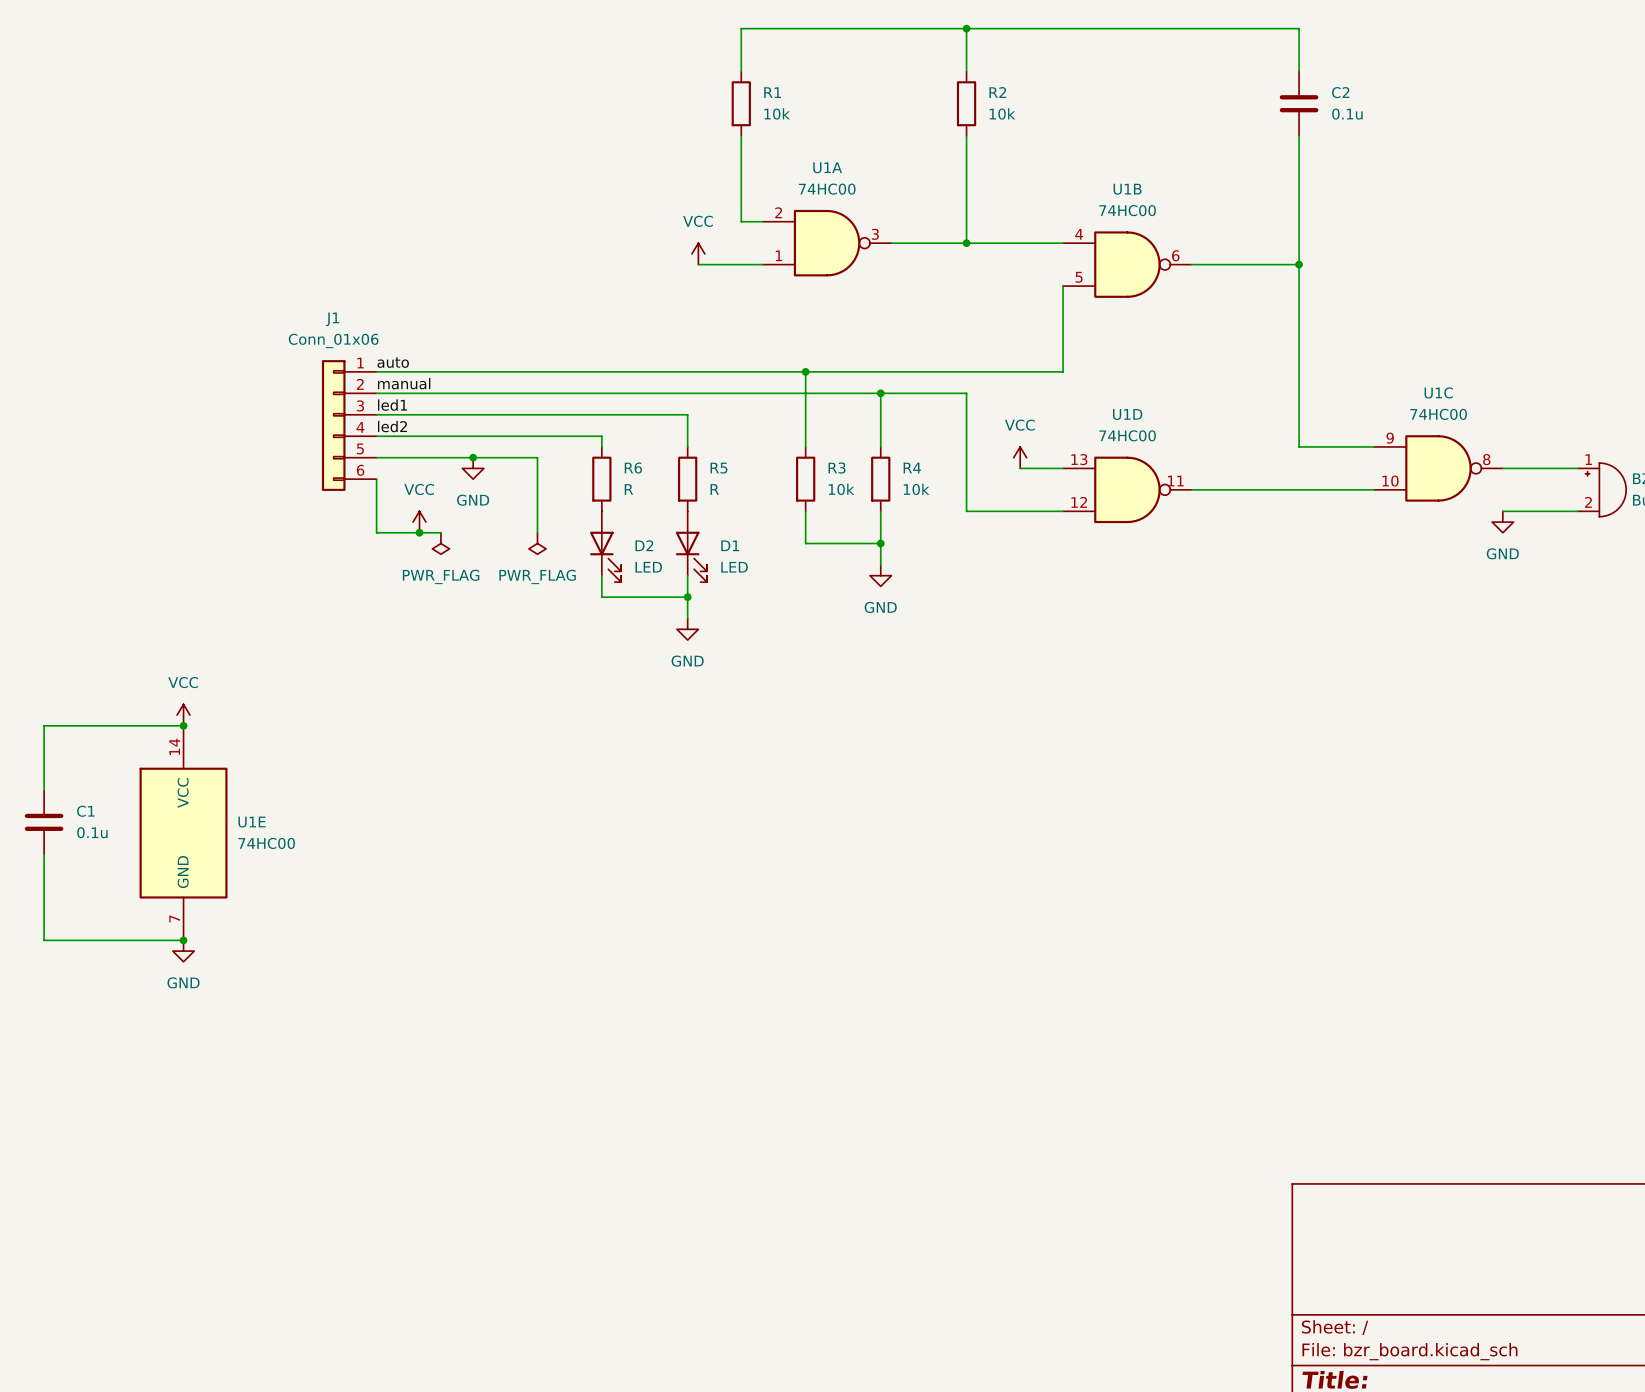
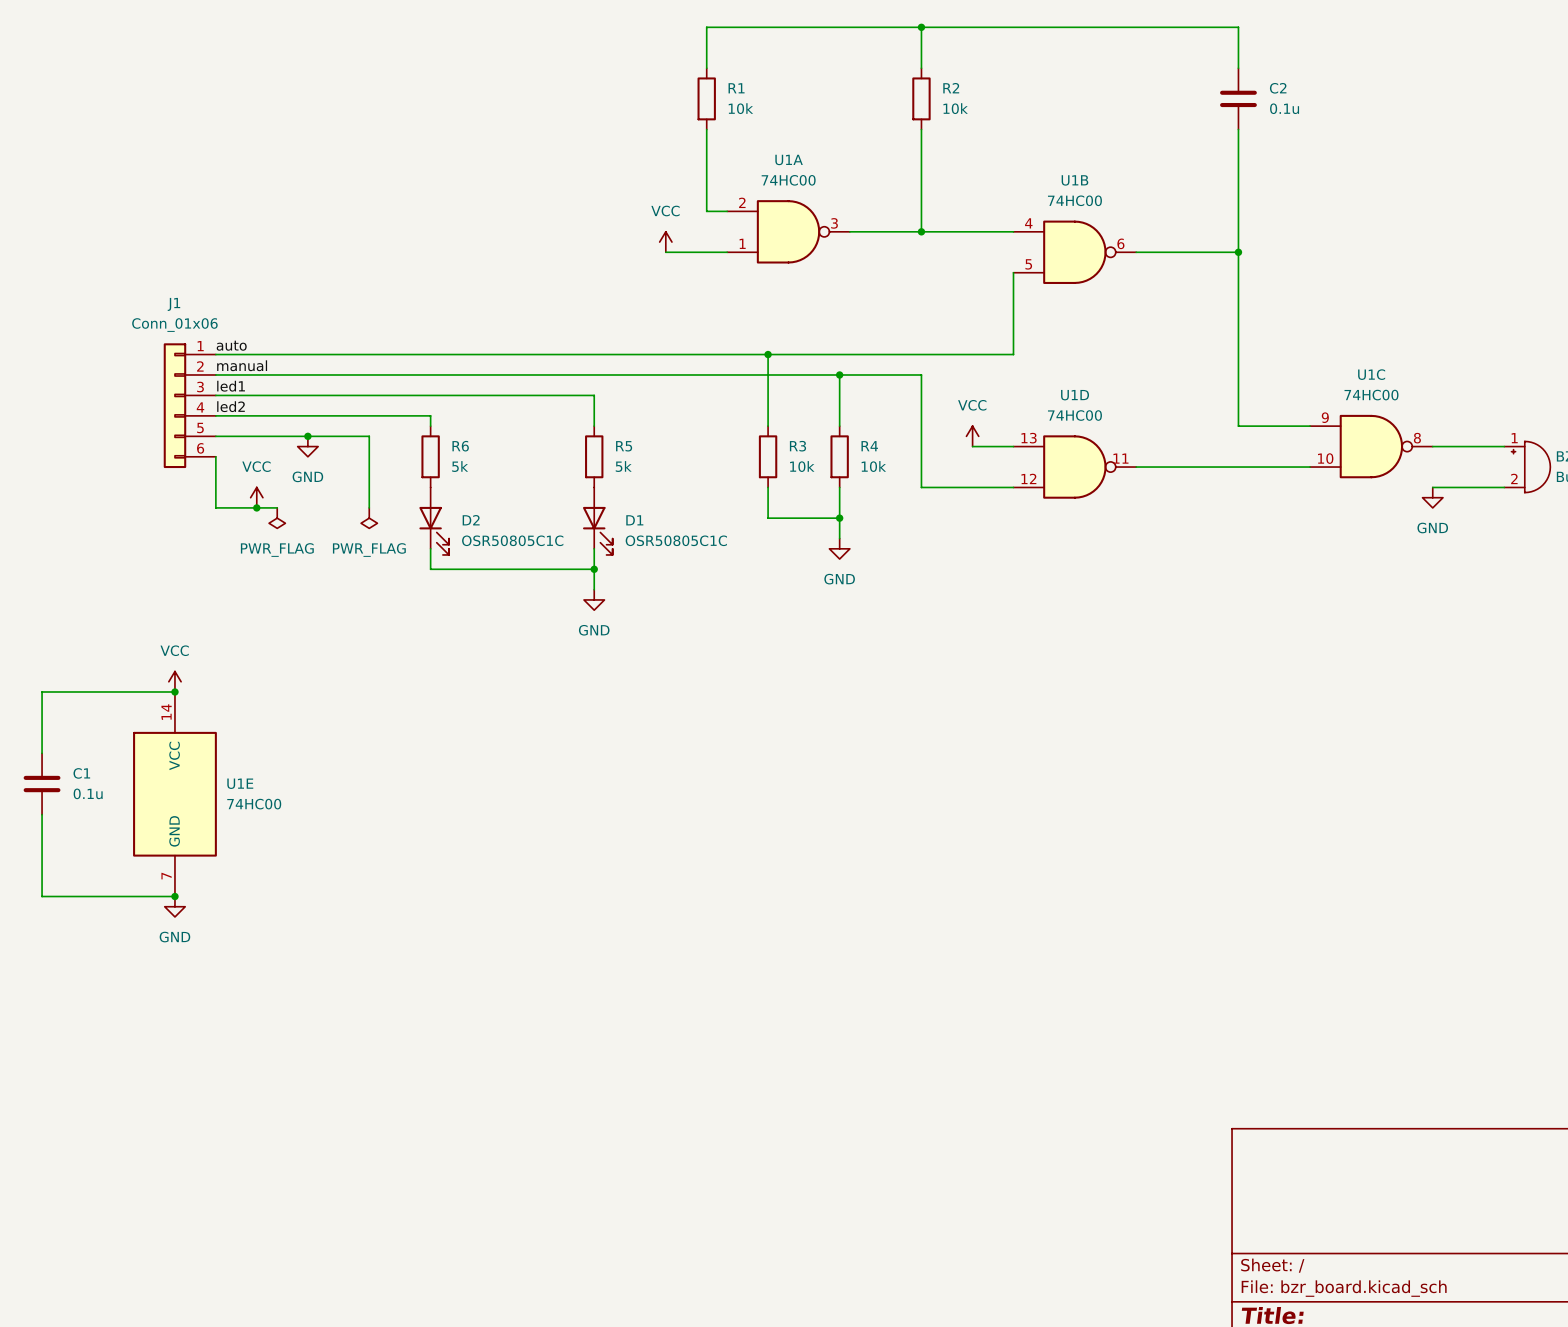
label position: auto (393, 362) -> auto (231, 345)
wire: none -> (215, 354) (359, 354)
label position: manual (404, 383) -> manual (242, 365)
wire: none -> (215, 374) (359, 374)
label position: led1 (392, 405) -> led1 (231, 386)
wire: none -> (215, 395) (359, 395)
wire: (623, 414) (687, 414) (687, 446) -> (594, 395) (594, 426)
J1 position: (349, 425) -> (189, 405)
label position: led2 (392, 426) -> led2 (231, 406)
wire: none -> (215, 415) (359, 415)
wire: (451, 436) (601, 436) (601, 446) -> (430, 415) (430, 426)
wire: none -> (215, 436) (359, 436)
junction: none -> (307, 436)
wire: (387, 457) (537, 457) (537, 532) -> (369, 436) (369, 507)
junction: (473, 457) -> none
power symbol: none -> GND (307, 446)
power symbol: GND (473, 468) -> none
wire: (376, 479) (376, 532) (440, 532) -> (215, 456) (215, 507) (277, 507)
R6 position: (601, 479) -> (430, 456)
R5 position: (687, 479) -> (594, 456)
R6 value: R (628, 489) -> 5k (460, 466)
R5 value: R (714, 489) -> 5k (623, 466)
power symbol position: VCC (419, 522) -> VCC (256, 497)
junction: none -> (256, 507)
junction: (419, 532) -> none
power symbol: none -> PWR_FLAG (277, 518)
power symbol position: PWR_FLAG (440, 543) -> PWR_FLAG (369, 518)
power symbol: PWR_FLAG (537, 543) -> none
D2 position: (605, 546) -> (434, 521)
D1 position: (691, 546) -> (597, 521)
D2 value: LED (648, 567) -> OSR50805C1C (512, 540)
D1 value: LED (734, 567) -> OSR50805C1C (676, 540)
wire: (601, 575) (601, 597) -> (430, 548) (430, 569) (573, 569)
wire: (687, 575) (687, 618) -> (594, 548) (594, 589)
wire: (623, 597) (687, 597) -> none
junction: none -> (594, 569)
junction: (687, 597) -> none
power symbol position: GND (687, 629) -> GND (594, 599)

